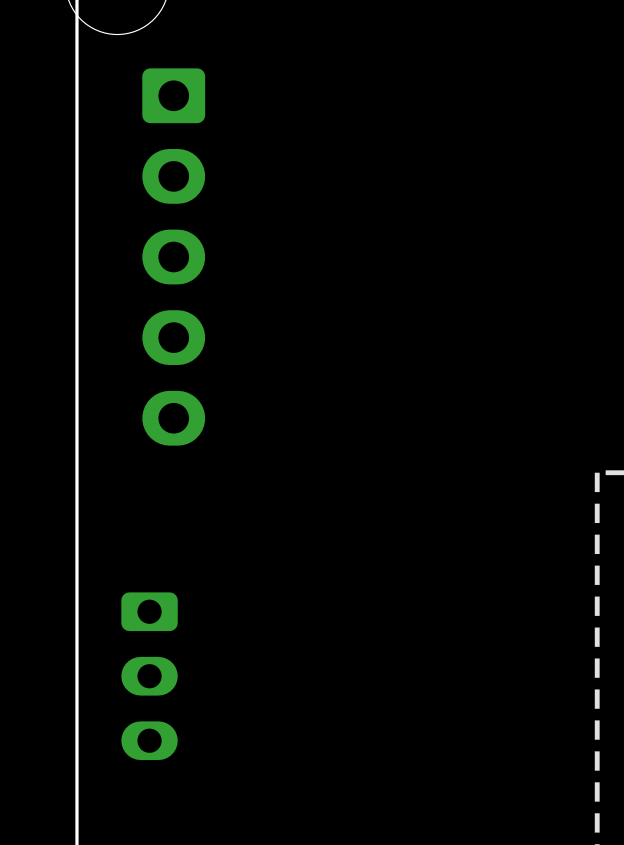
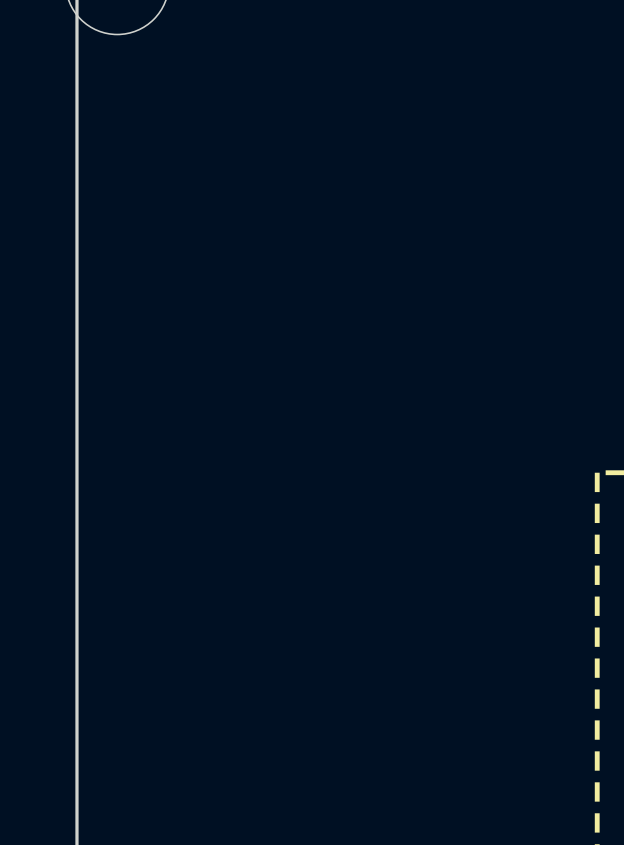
part: (173, 257) -> none
part: (149, 676) -> none

